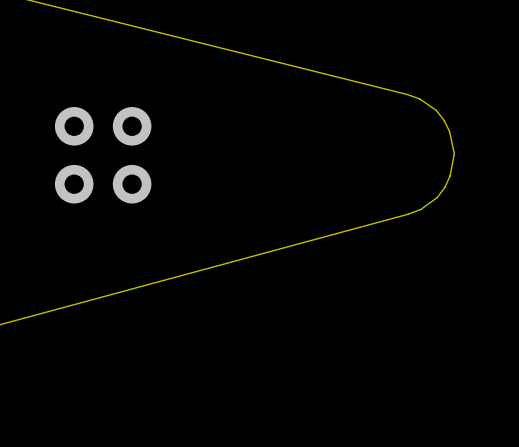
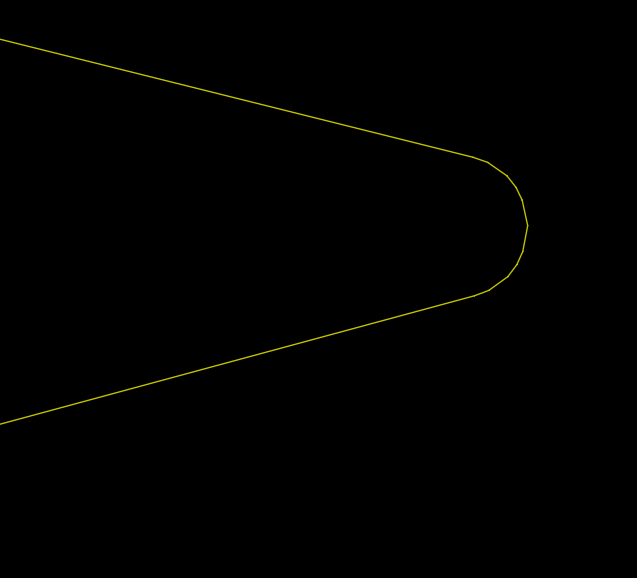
via: (74, 126) -> none
via: (132, 126) -> none
via: (74, 184) -> none
via: (132, 184) -> none

